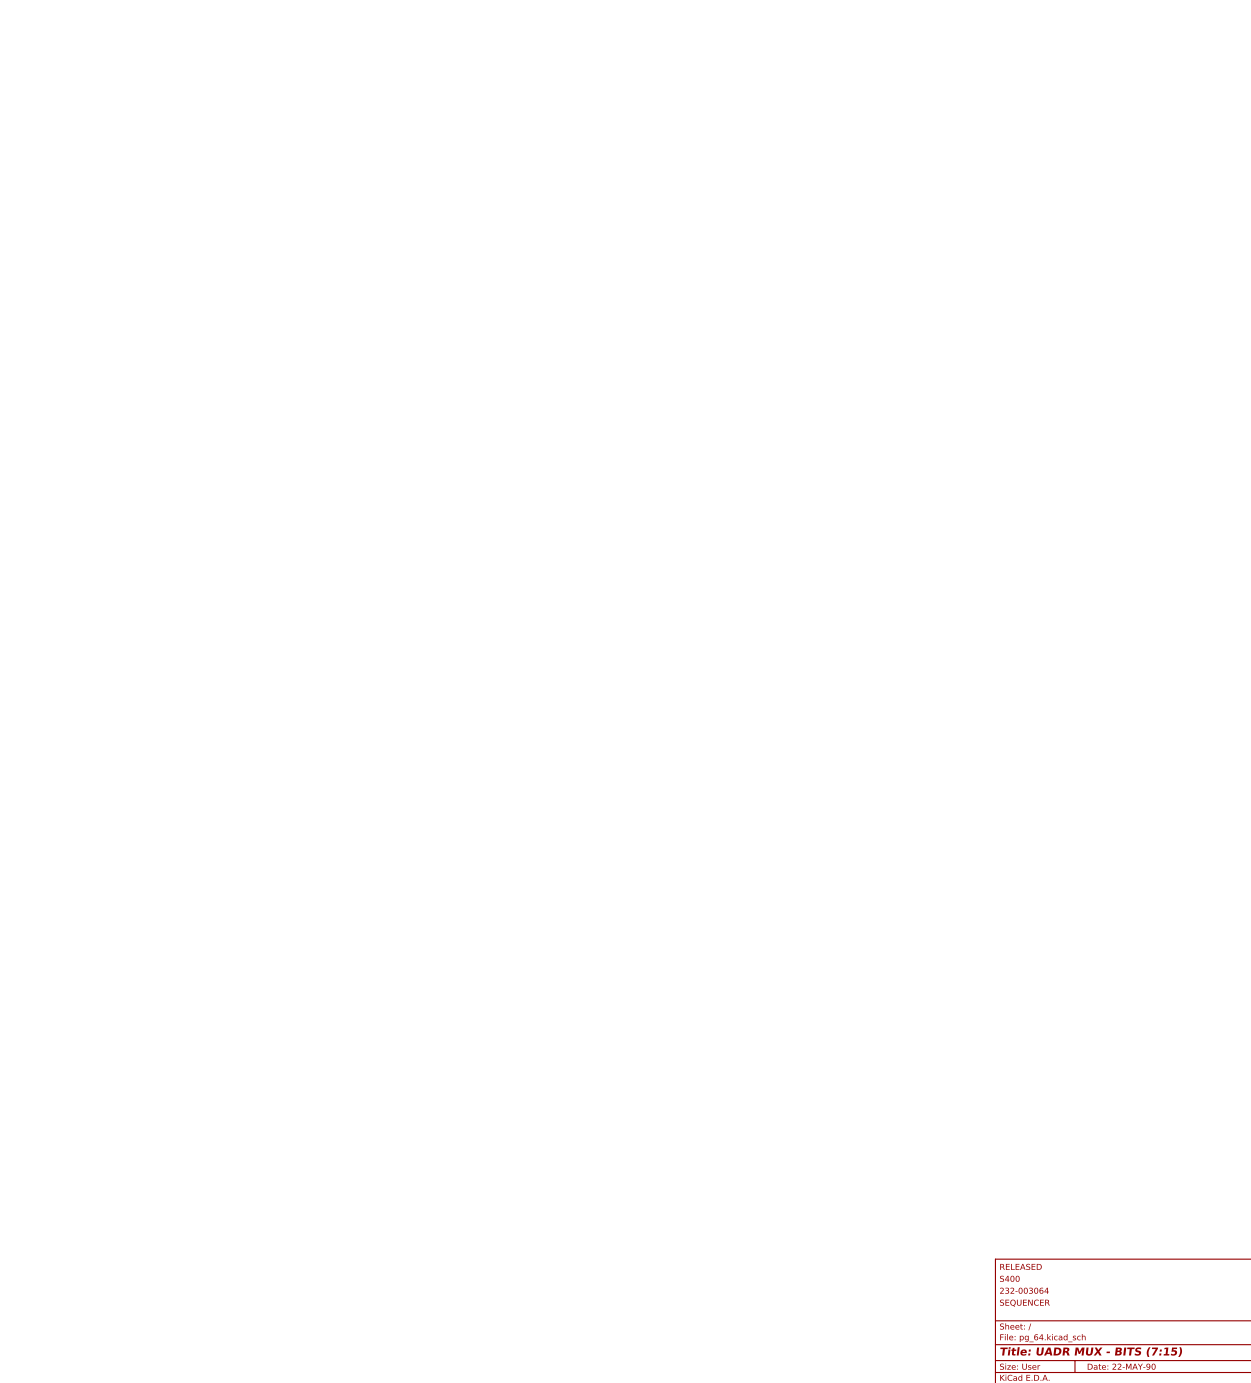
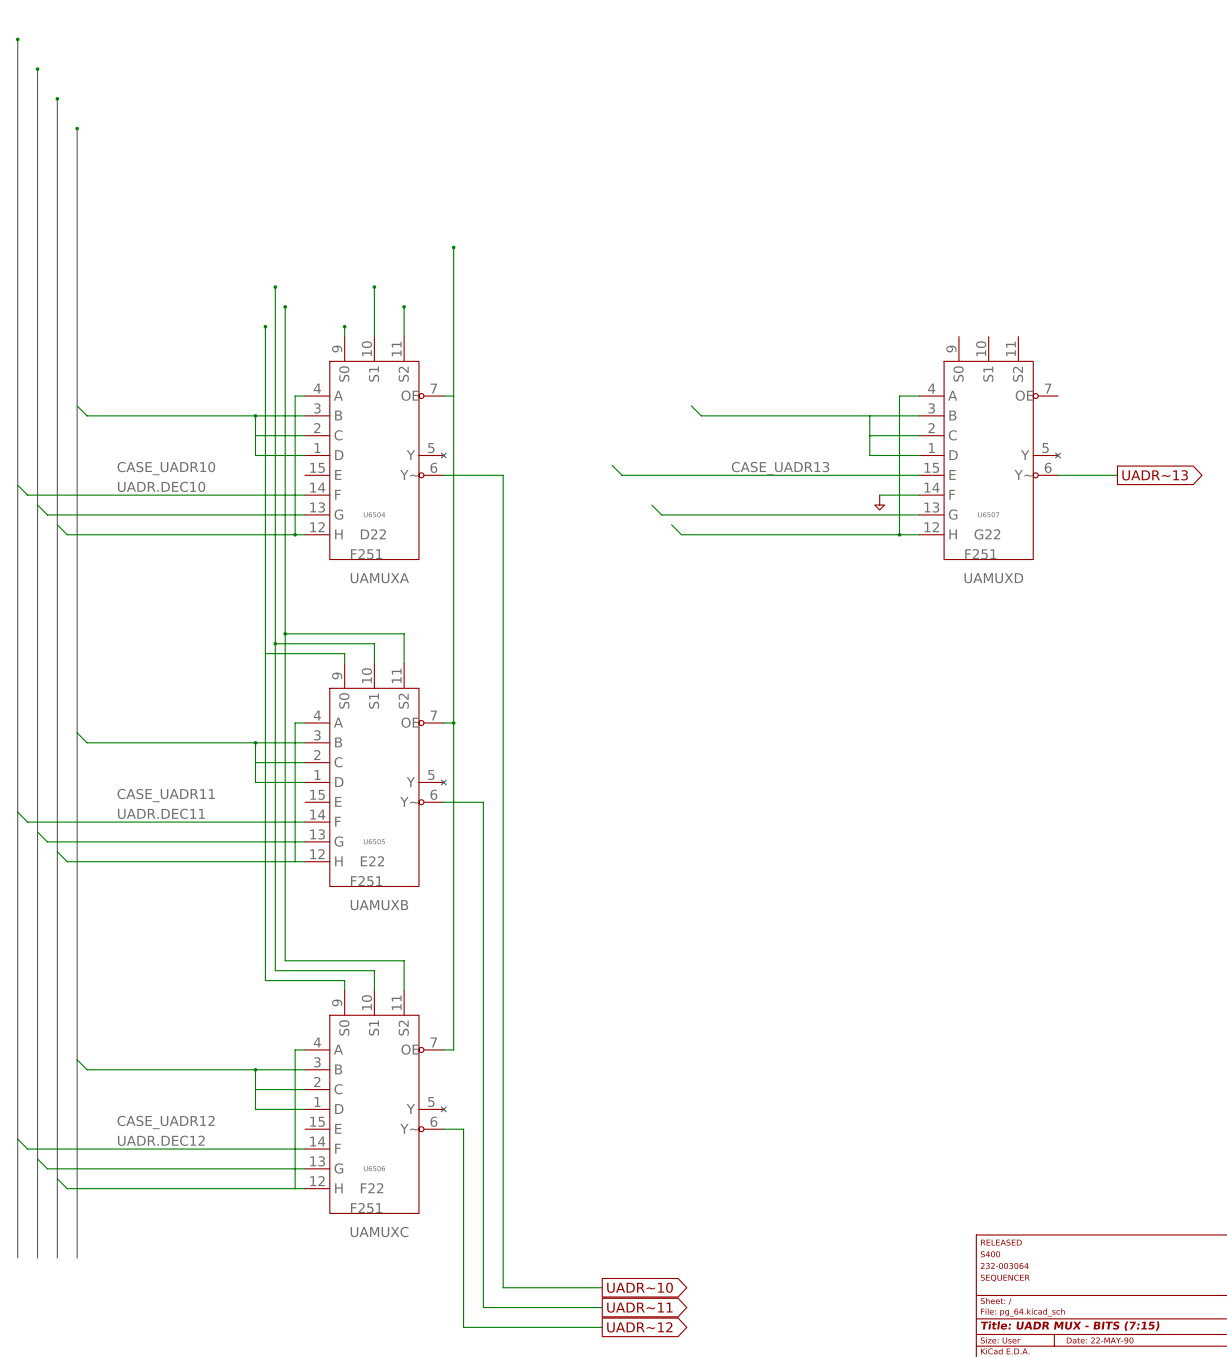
bus: none -> (17, 39) (17, 1258)
junction: none -> (17, 39)
bus: none -> (37, 69) (37, 1258)
junction: none -> (37, 69)
bus: none -> (57, 98) (57, 1258)
junction: none -> (57, 98)
bus: none -> (77, 128) (77, 1258)
junction: none -> (77, 128)
wire: none -> (453, 247) (453, 1049) (443, 1049)
junction: none -> (453, 247)
wire: none -> (275, 287) (275, 970) (374, 970) (374, 990)
junction: none -> (275, 287)
wire: none -> (374, 287) (374, 336)
junction: none -> (374, 287)
wire: none -> (285, 306) (285, 960) (404, 960) (404, 990)
junction: none -> (285, 306)
wire: none -> (404, 306) (404, 336)
junction: none -> (404, 306)
wire: none -> (265, 326) (265, 980) (344, 980) (344, 990)
junction: none -> (265, 326)
wire: none -> (344, 326) (344, 336)
junction: none -> (344, 326)
wire: none -> (305, 396) (295, 396) (295, 534)
wire: none -> (443, 396) (453, 396)
wire: none -> (919, 396) (899, 396) (899, 534)
wire: none -> (77, 405) (87, 415) (305, 415)
wire: none -> (691, 405) (701, 415) (919, 415)
wire: none -> (255, 415) (255, 455) (305, 455)
junction: none -> (255, 415)
wire: none -> (869, 415) (869, 455) (919, 455)
wire: none -> (255, 435) (305, 435)
wire: none -> (869, 435) (919, 435)
part: none -> F251 (374, 448)
part: none -> F251 (988, 448)
no-connect mark: none -> (443, 455)
no-connect mark: none -> (1058, 455)
wire: none -> (612, 465) (622, 475) (919, 475)
label: none -> CASE_UADR10 (166, 468)
label: none -> CASE_UADR13 (780, 468)
wire: none -> (443, 475) (503, 475) (503, 1287) (602, 1287)
wire: none -> (1058, 475) (1117, 475)
global label: none -> UADR~13 (1155, 475)
wire: none -> (17, 485) (27, 495) (305, 495)
label: none -> UADR.DEC10 (161, 486)
wire: none -> (879, 495) (919, 495)
power symbol: none -> (879, 502)
wire: none -> (37, 505) (47, 514) (305, 514)
wire: none -> (651, 505) (661, 514) (919, 514)
wire: none -> (57, 524) (67, 534) (305, 534)
wire: none -> (671, 524) (681, 534) (919, 534)
junction: none -> (295, 534)
junction: none -> (899, 534)
wire: none -> (285, 633) (404, 633) (404, 663)
junction: none -> (285, 633)
wire: none -> (275, 643) (374, 643) (374, 663)
junction: none -> (275, 643)
wire: none -> (265, 653) (344, 653) (344, 663)
wire: none -> (305, 723) (295, 723) (295, 861)
wire: none -> (443, 723) (453, 723)
junction: none -> (453, 723)
wire: none -> (77, 732) (87, 742) (305, 742)
wire: none -> (255, 742) (255, 782) (305, 782)
junction: none -> (255, 742)
wire: none -> (255, 762) (305, 762)
part: none -> F251 (374, 775)
no-connect mark: none -> (443, 782)
label: none -> CASE_UADR11 (166, 795)
wire: none -> (443, 802) (483, 802) (483, 1307) (602, 1307)
wire: none -> (17, 812) (27, 822) (305, 822)
label: none -> UADR.DEC11 (161, 813)
wire: none -> (37, 831) (47, 841) (305, 841)
wire: none -> (57, 851) (67, 861) (305, 861)
wire: none -> (305, 1049) (295, 1049) (295, 1188)
wire: none -> (77, 1059) (87, 1069) (305, 1069)
wire: none -> (255, 1069) (255, 1109) (305, 1109)
junction: none -> (255, 1069)
wire: none -> (255, 1089) (305, 1089)
part: none -> F251 (374, 1101)
no-connect mark: none -> (443, 1109)
label: none -> CASE_UADR12 (166, 1122)
wire: none -> (443, 1129) (463, 1129) (463, 1327) (602, 1327)
wire: none -> (17, 1139) (27, 1149) (305, 1149)
label: none -> UADR.DEC12 (161, 1140)
wire: none -> (37, 1158) (47, 1168) (305, 1168)
wire: none -> (57, 1178) (67, 1188) (305, 1188)
global label: none -> UADR~10 (640, 1287)
global label: none -> UADR~11 (639, 1307)
global label: none -> UADR~12 (639, 1327)

